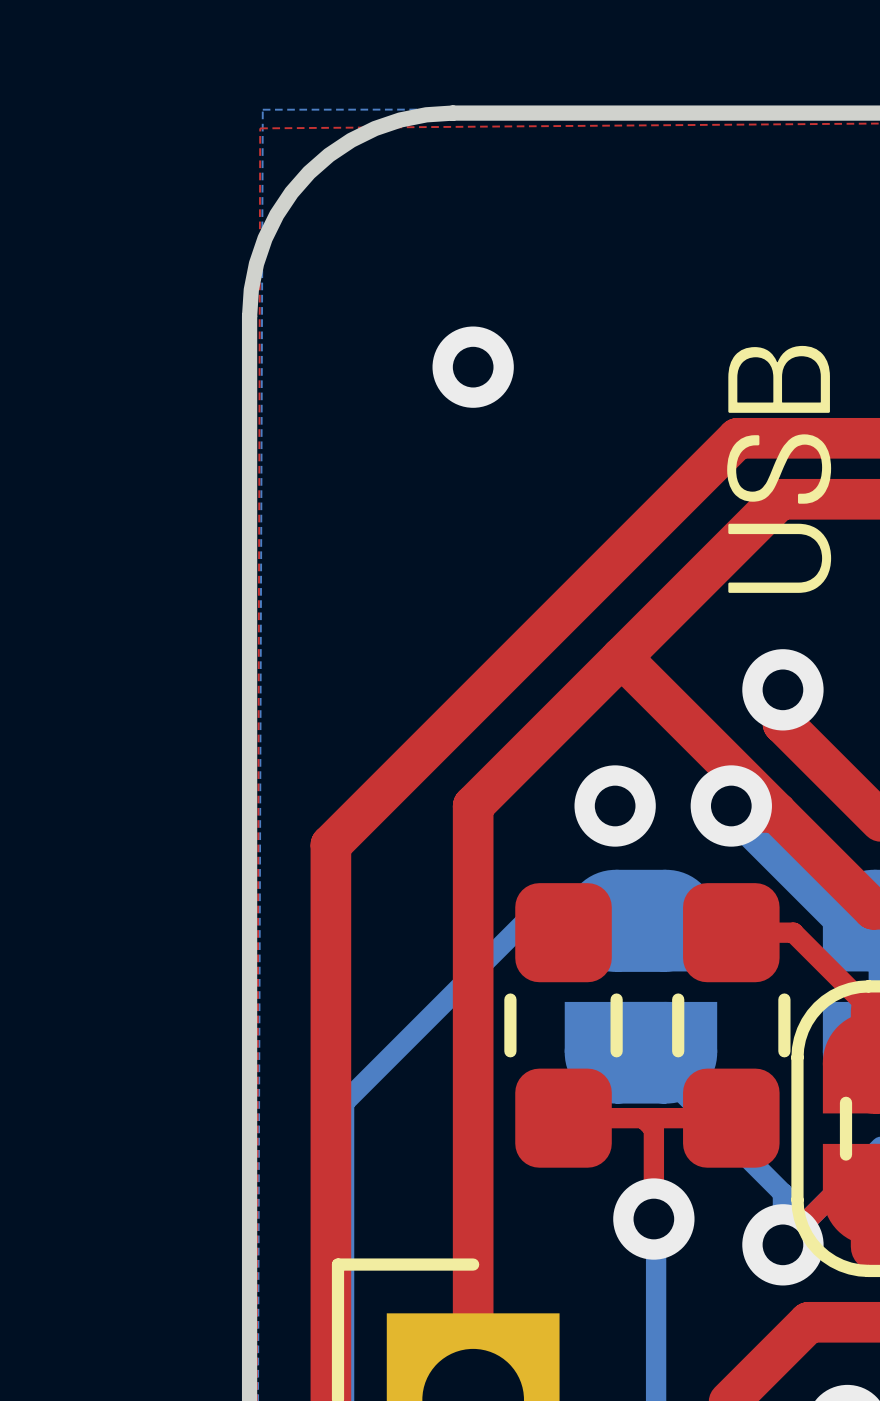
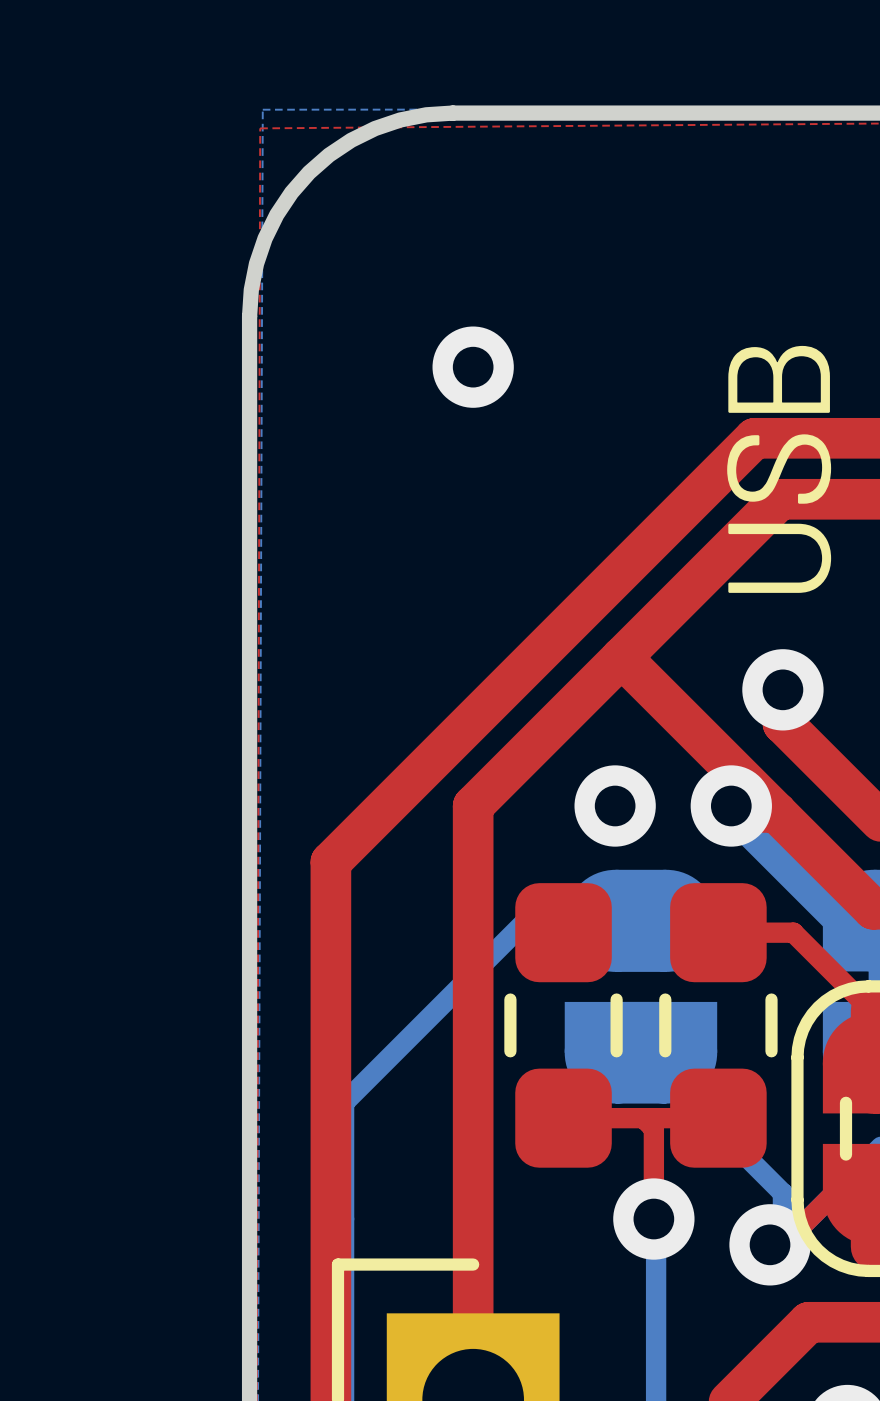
top track: (754, 438) (737, 438) (330, 845) (330, 862) -> (754, 438) (330, 862)
part position: (731, 1025) -> (718, 1025)
via position: (782, 1244) -> (770, 1244)

